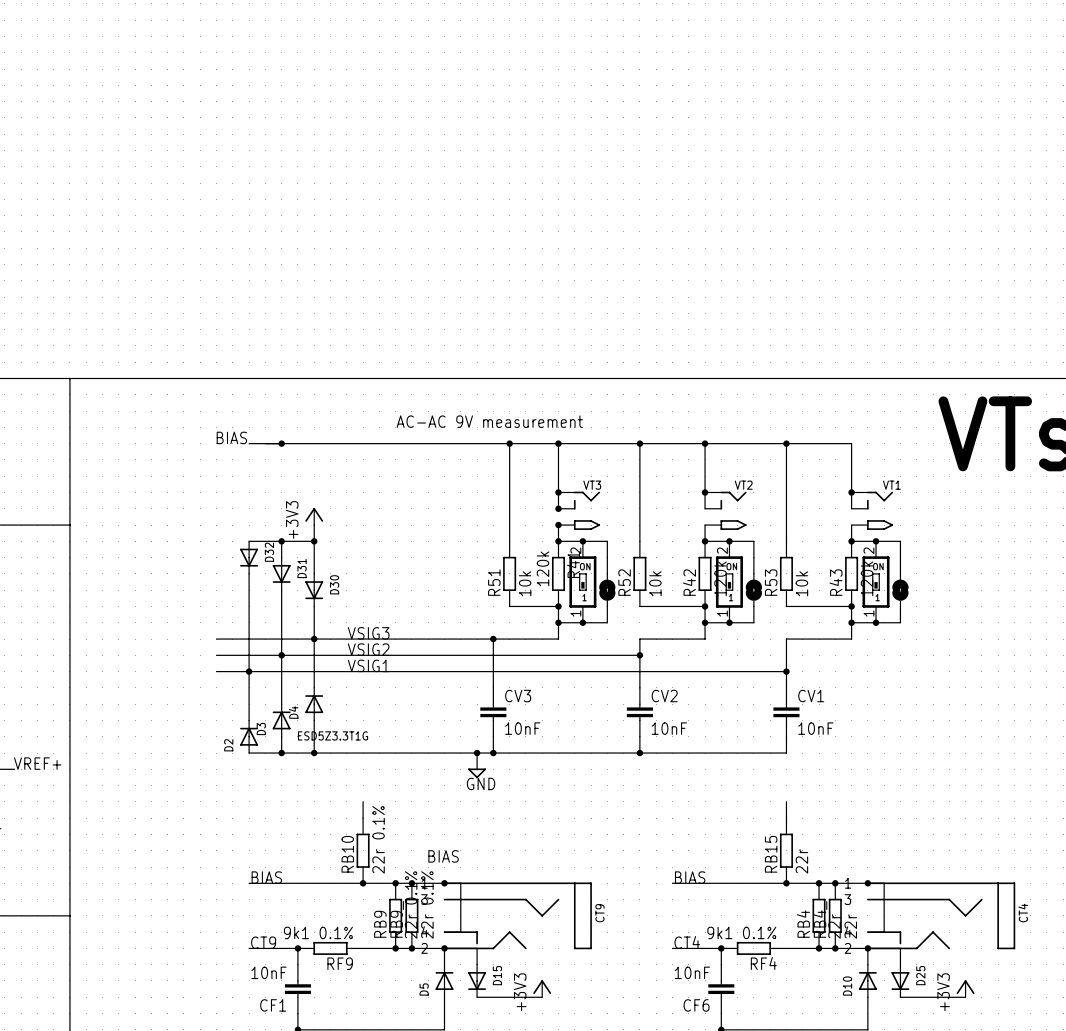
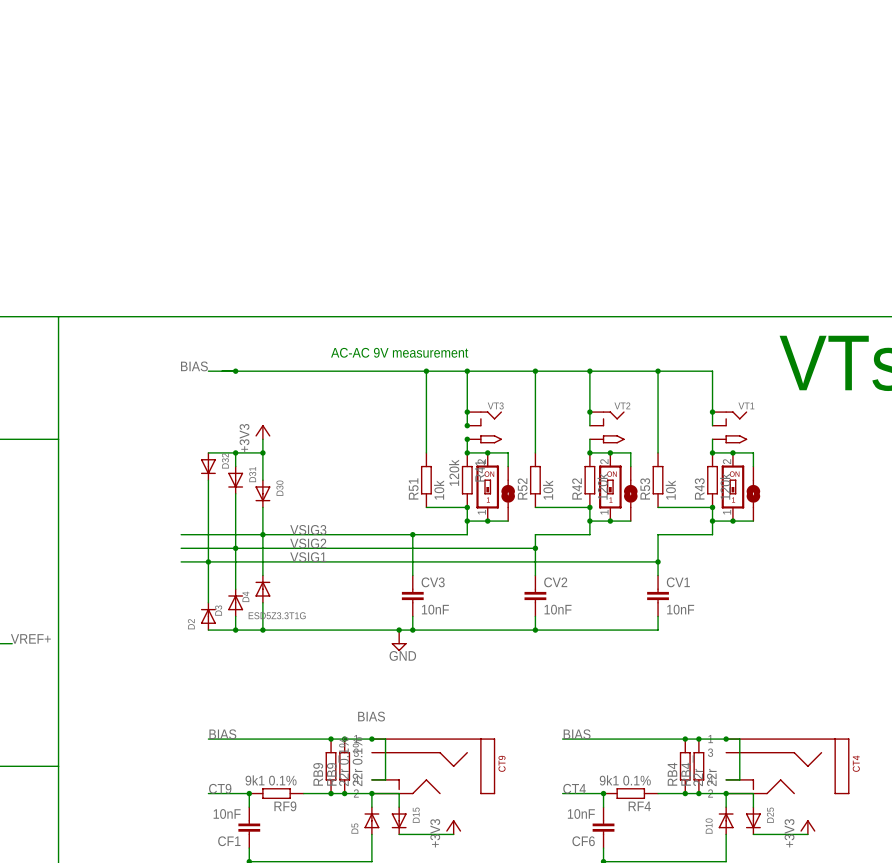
wire: (363, 801) (363, 818) -> none
wire: (786, 801) (786, 818) -> none
RB10: 22r 0.1% (363, 850) -> none
RB15: 22r (786, 850) -> none
junction: (363, 883) -> none
junction: (786, 883) -> none

